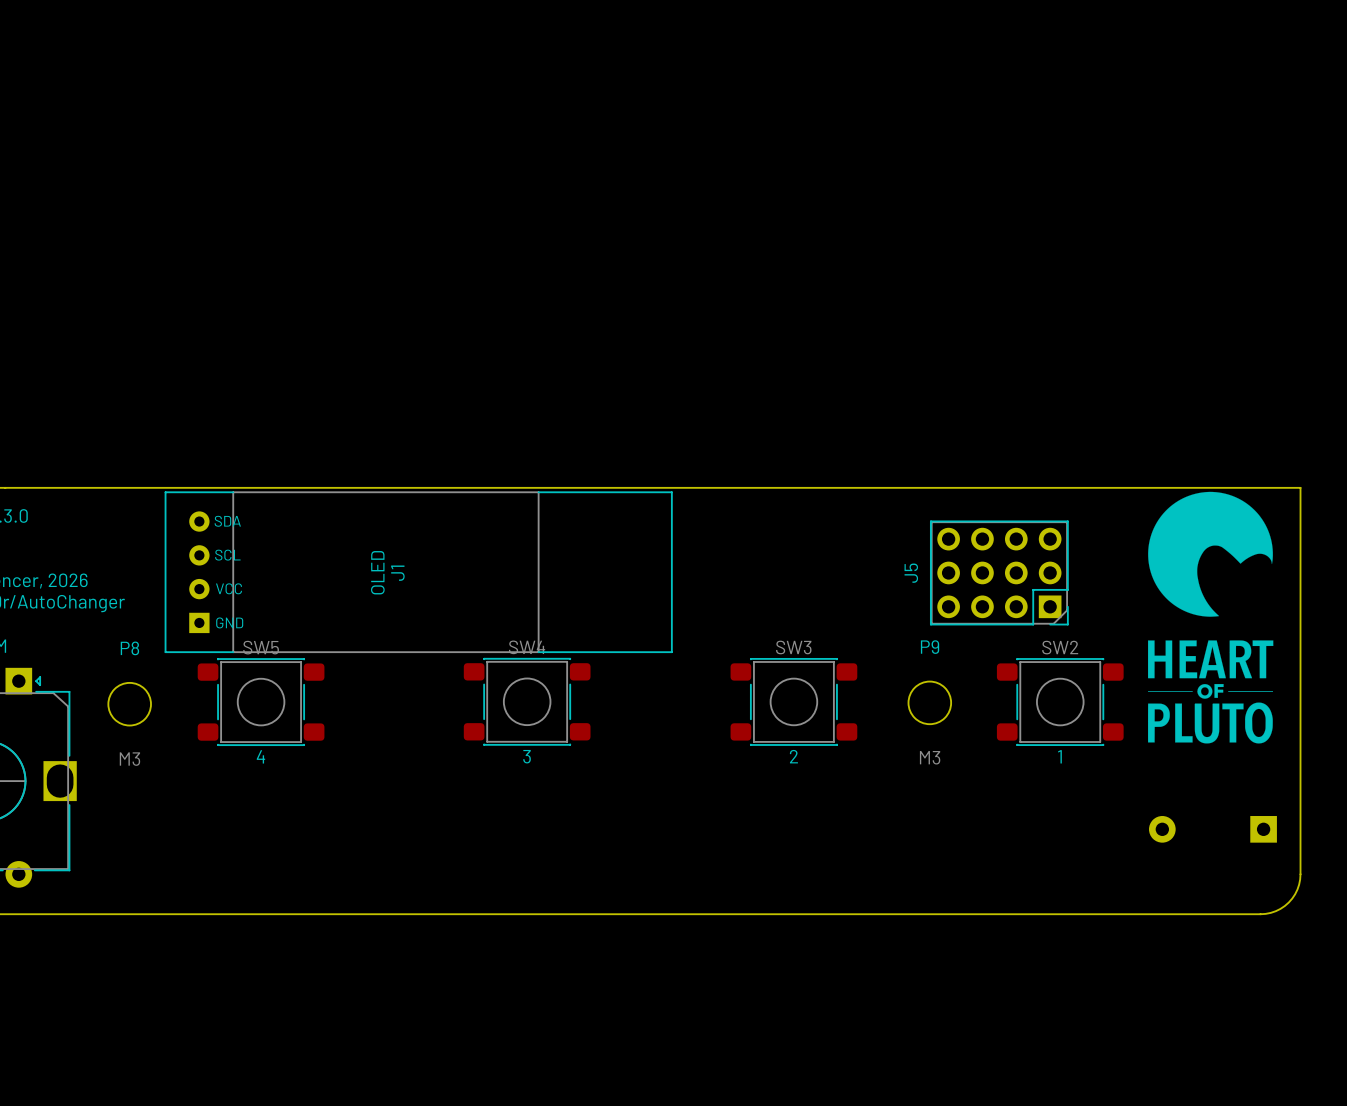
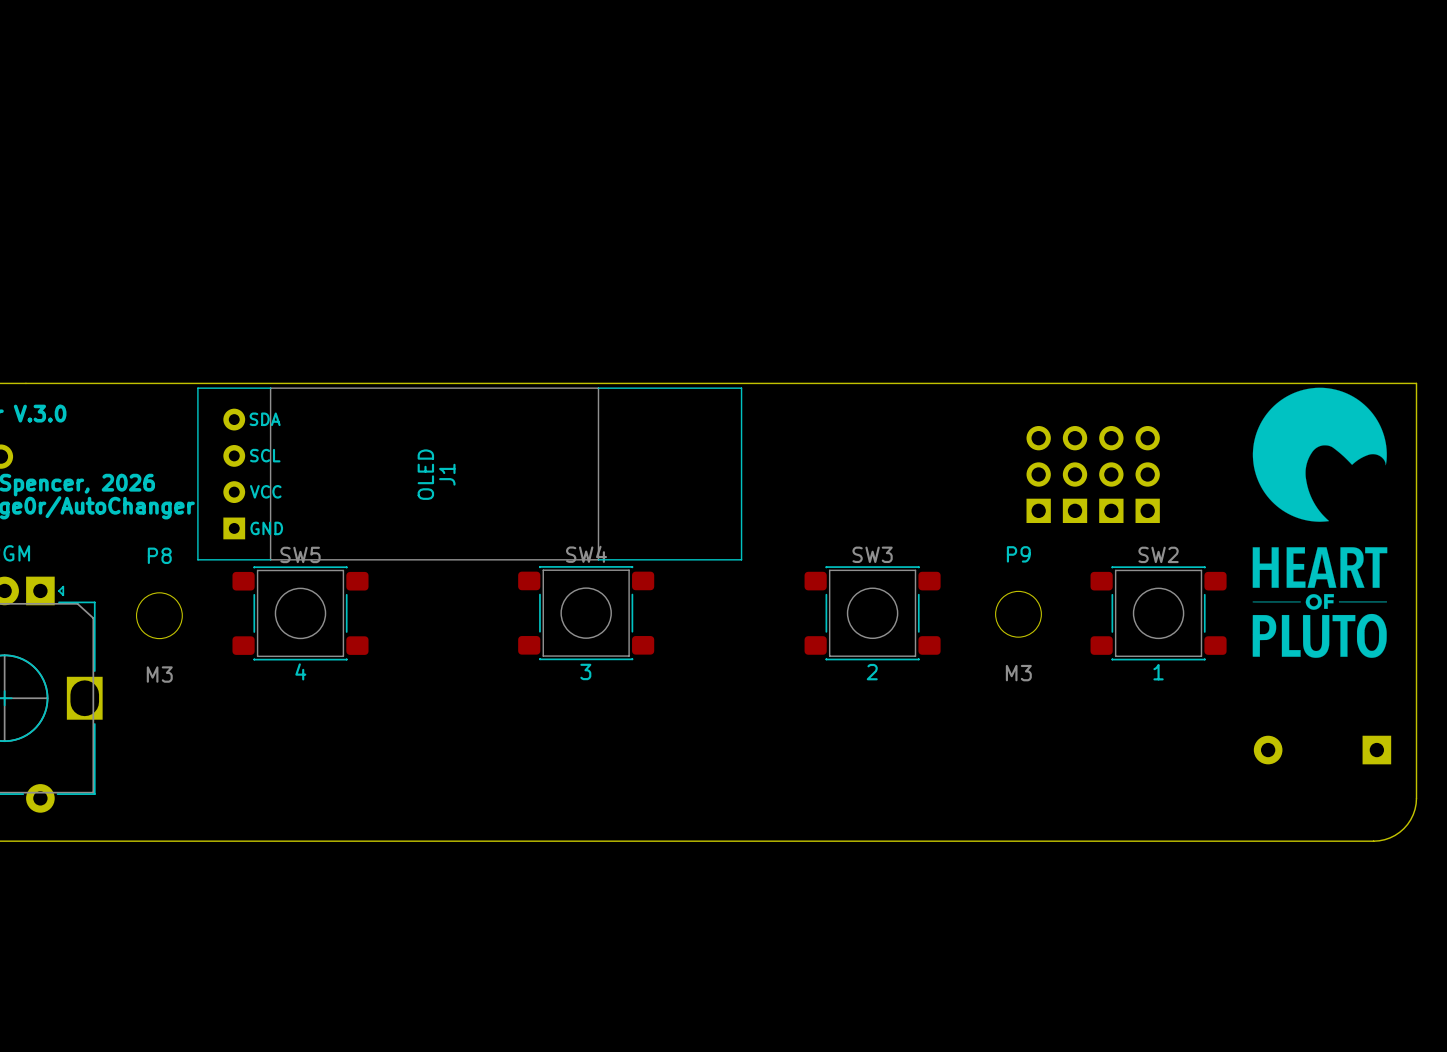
part: none -> (1038, 474)
part: none -> (1075, 474)
J5: (999, 572) -> none
part: none -> (1111, 474)
part: none -> (1147, 474)

